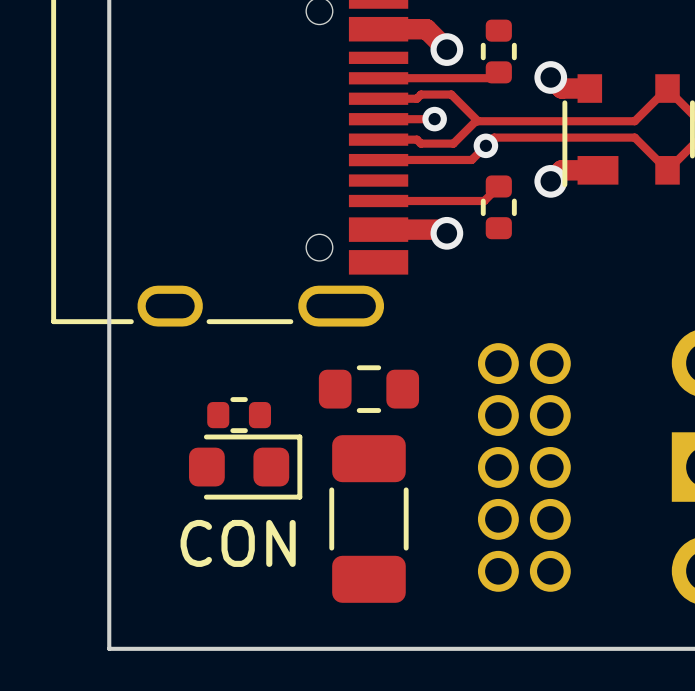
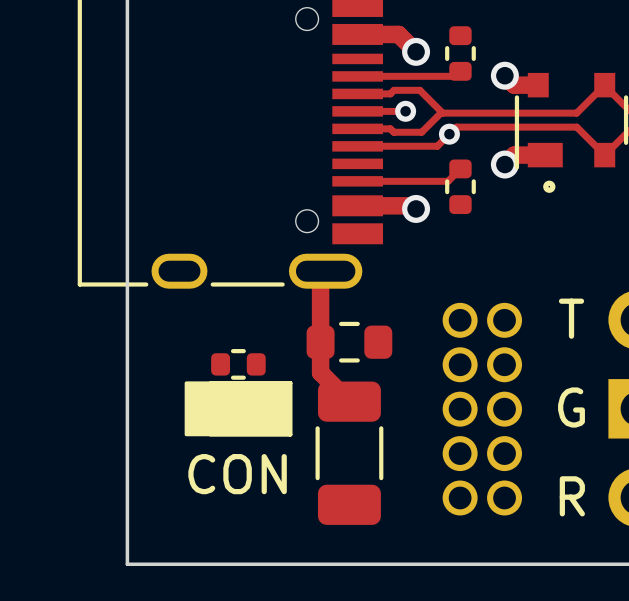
drawing: none -> [543, 180, 556, 193]
track: none -> (325, 271) (320, 276) (320, 372) (349, 401)
text: none -> T (571, 318)
part footprint: [189, 434, 303, 500] -> [184, 381, 293, 437]
text: none -> G (571, 407)
text: none -> R (572, 496)

